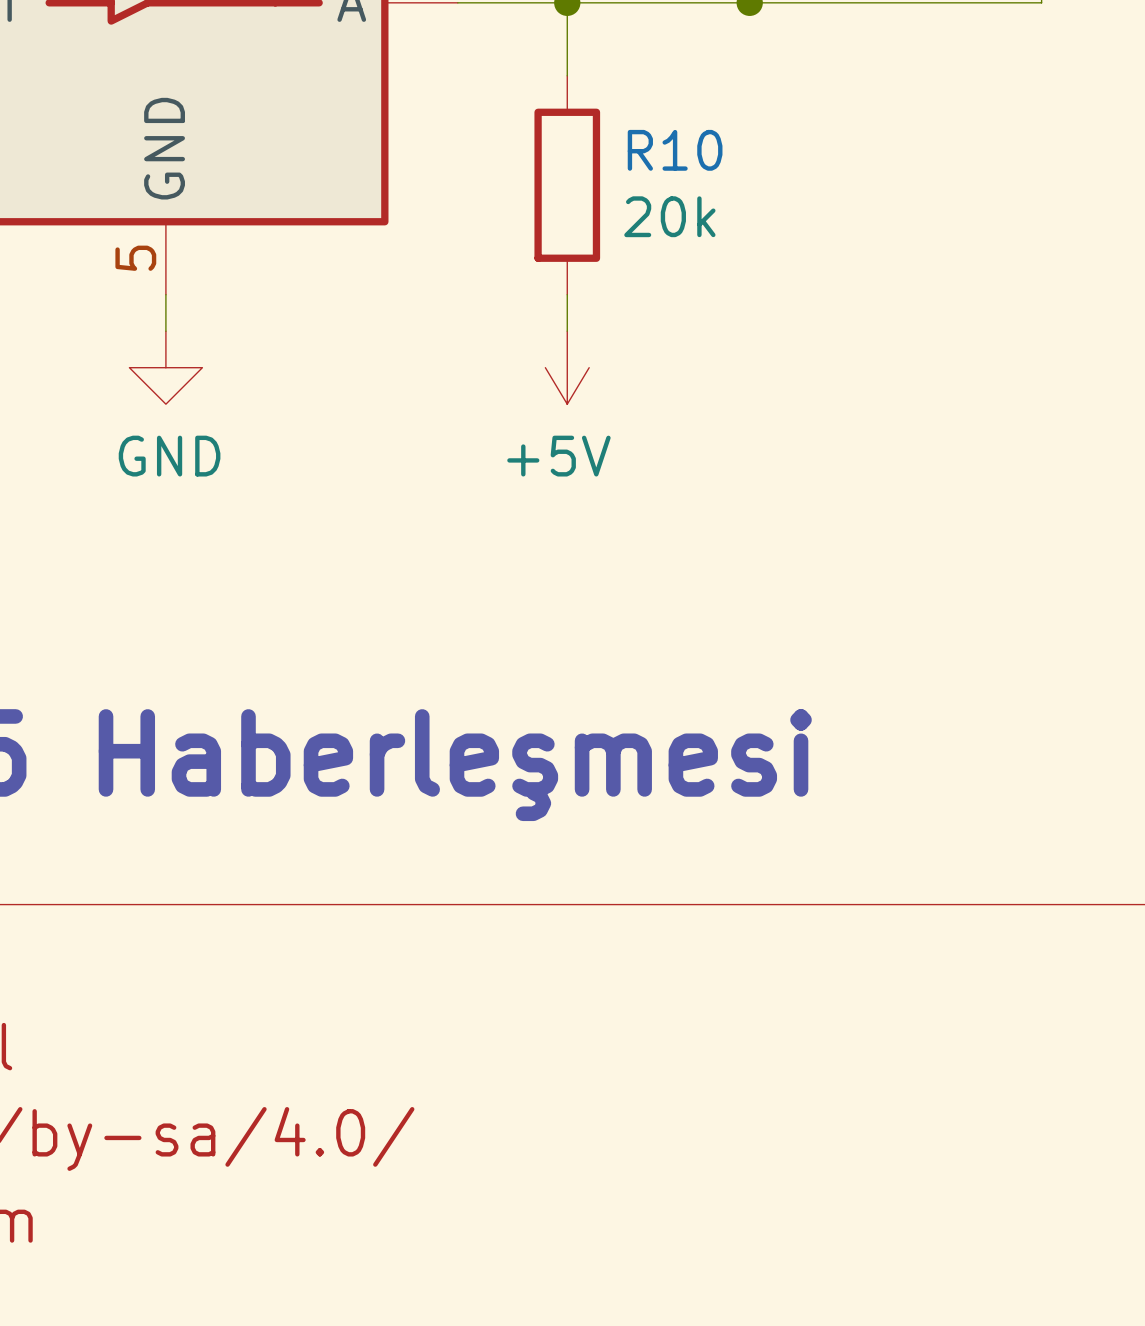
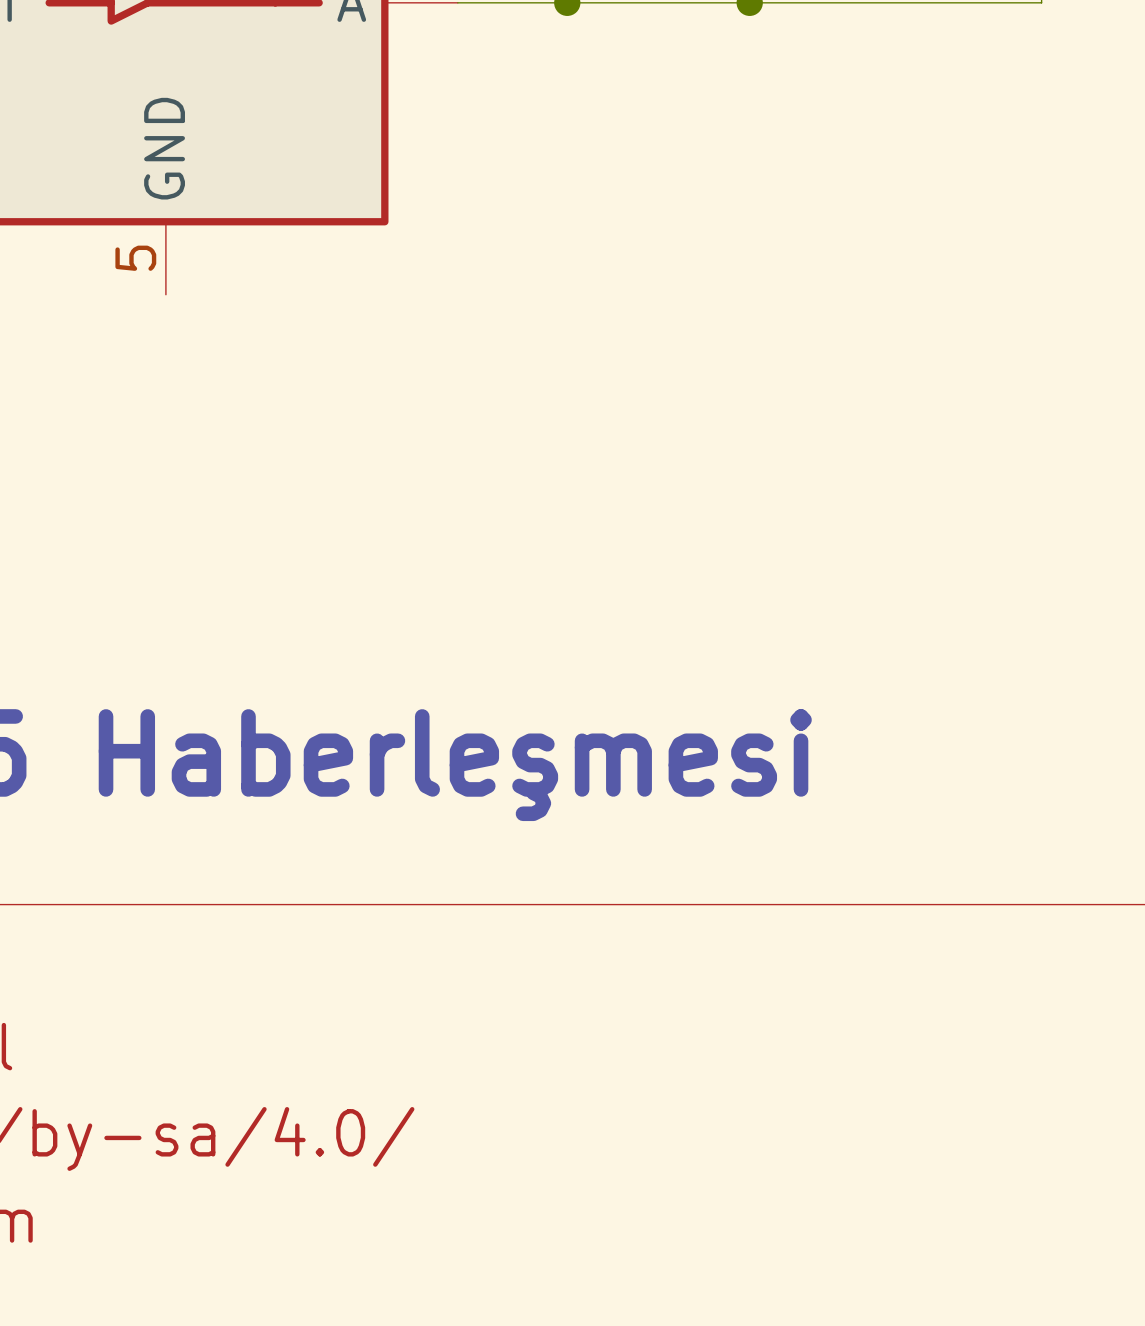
wire: (567, 2) (567, 75) -> none
R10: 20k (567, 185) -> none
wire: (165, 294) (165, 331) -> none
wire: (567, 294) (567, 331) -> none
power symbol: GND (165, 367) -> none
power symbol: +5V (567, 367) -> none

